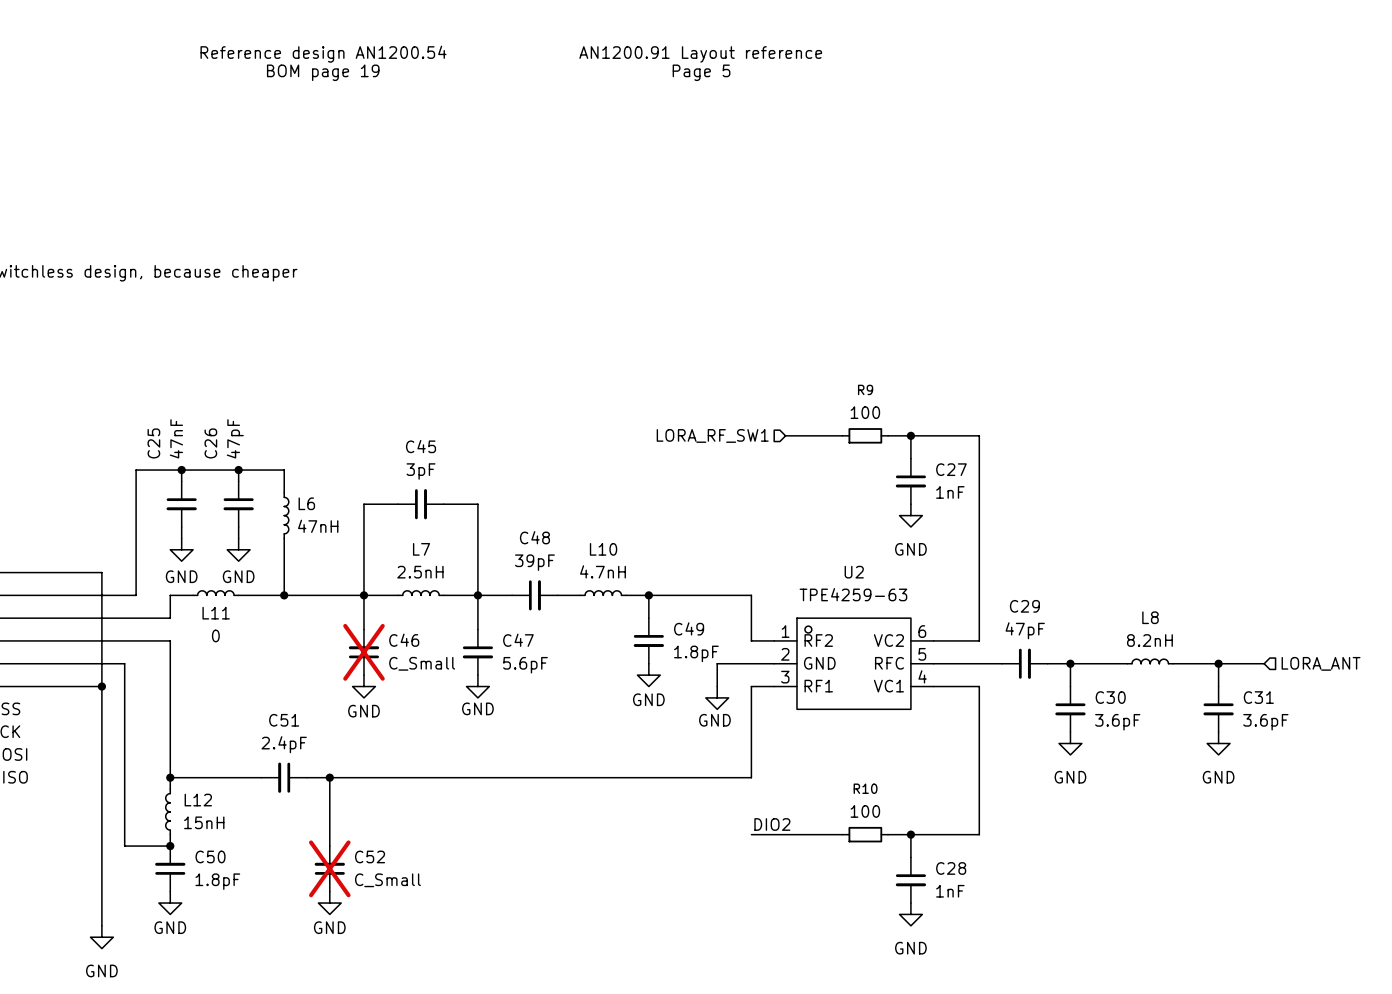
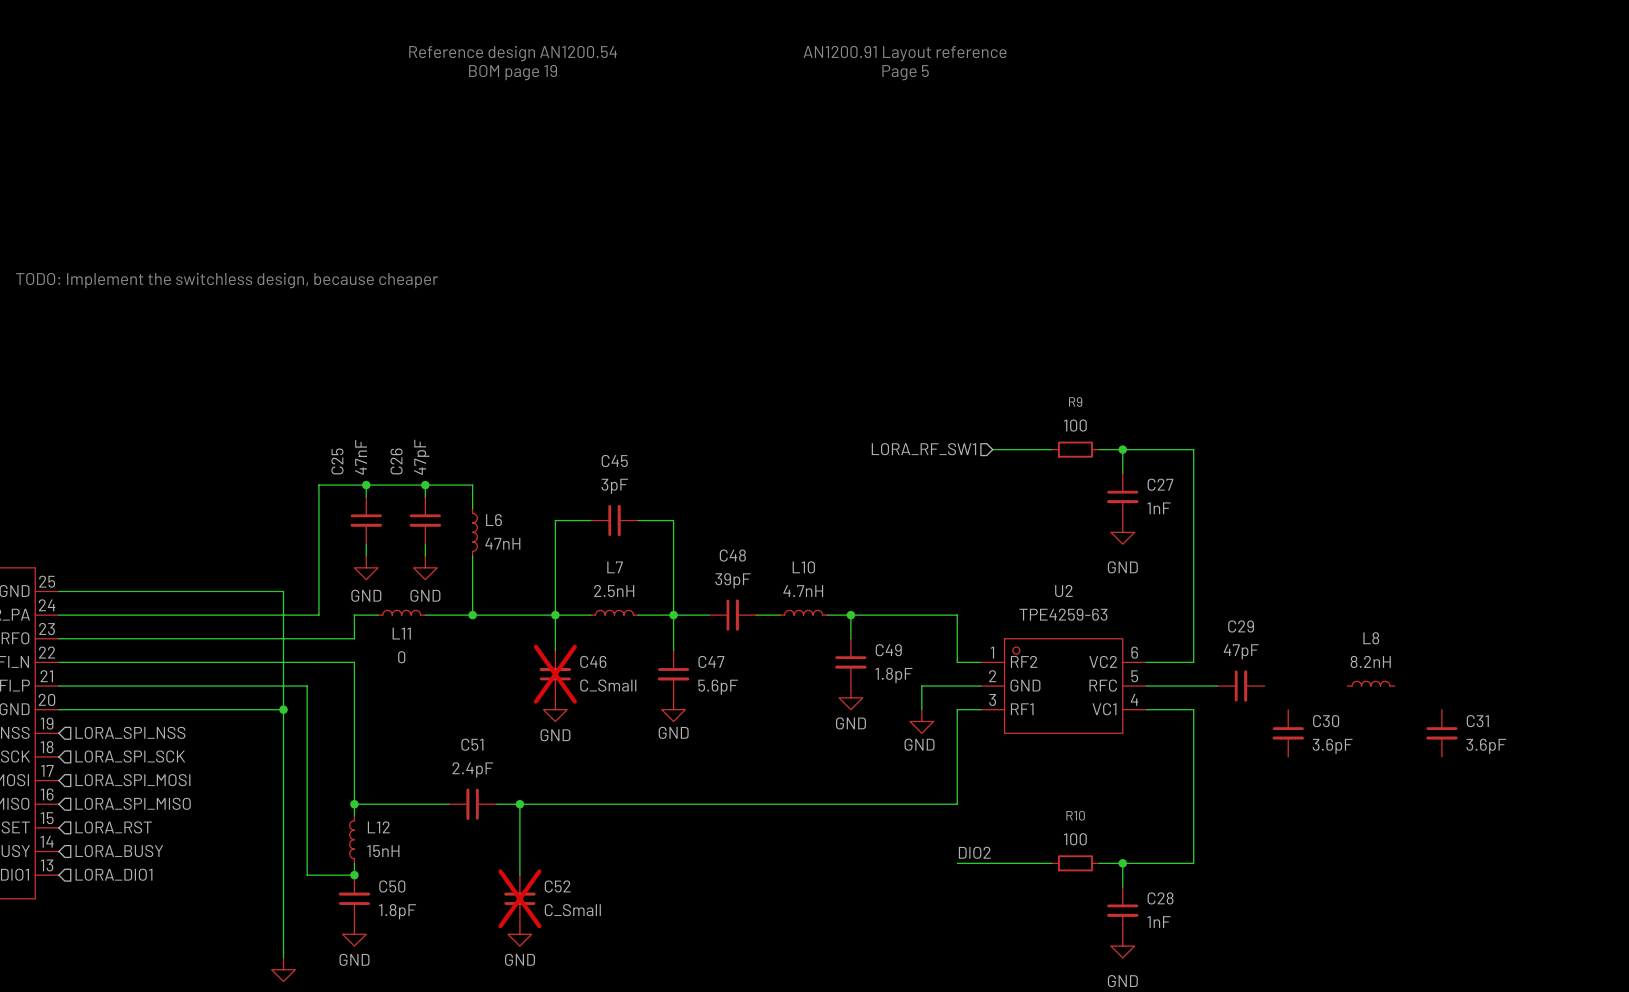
wire: (1047, 663) (1127, 663) -> none
wire: (1070, 663) (1070, 686) -> none
junction: (1070, 663) -> none
wire: (1173, 663) (1264, 663) -> none
wire: (1218, 663) (1218, 686) -> none
junction: (1218, 663) -> none
hierarchical label: LORA_ANT (1321, 663) -> none
power symbol: GND (1070, 743) -> none
power symbol: GND (1218, 743) -> none

